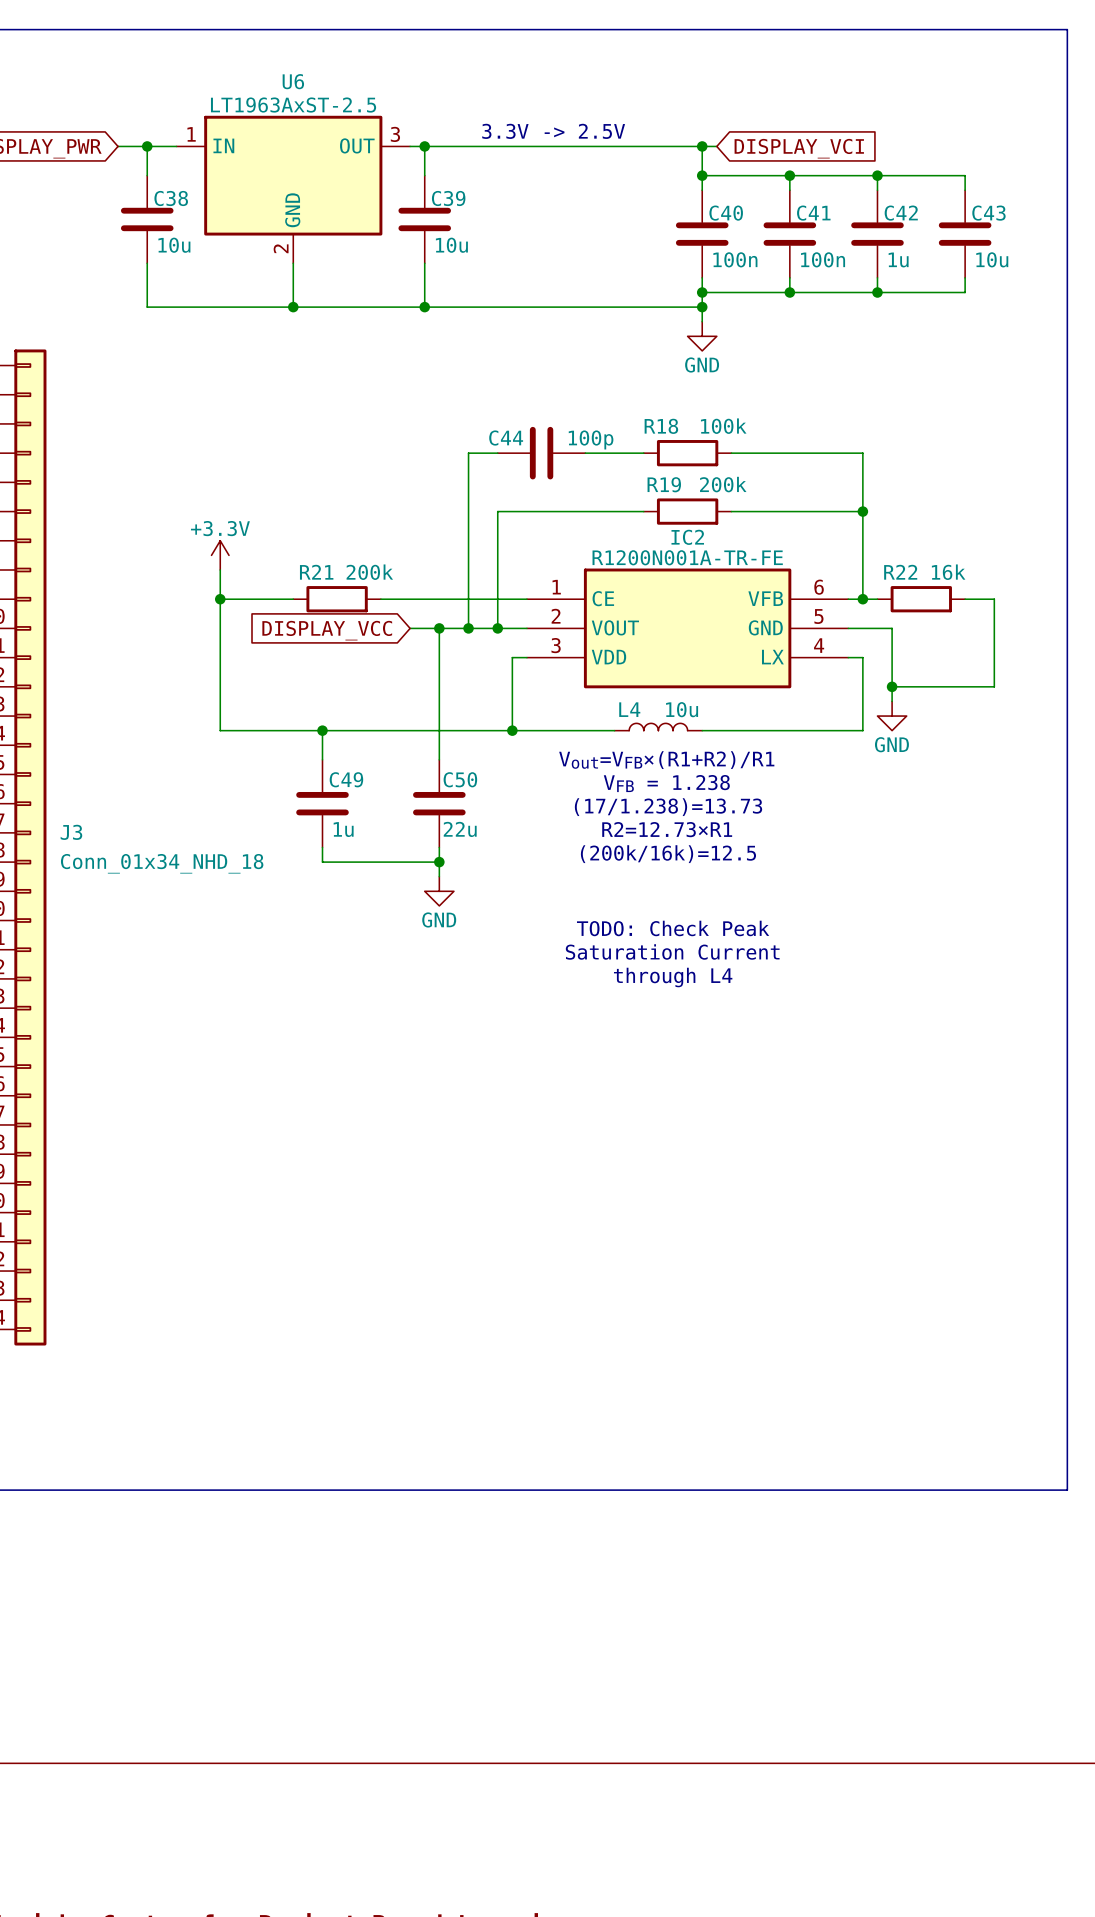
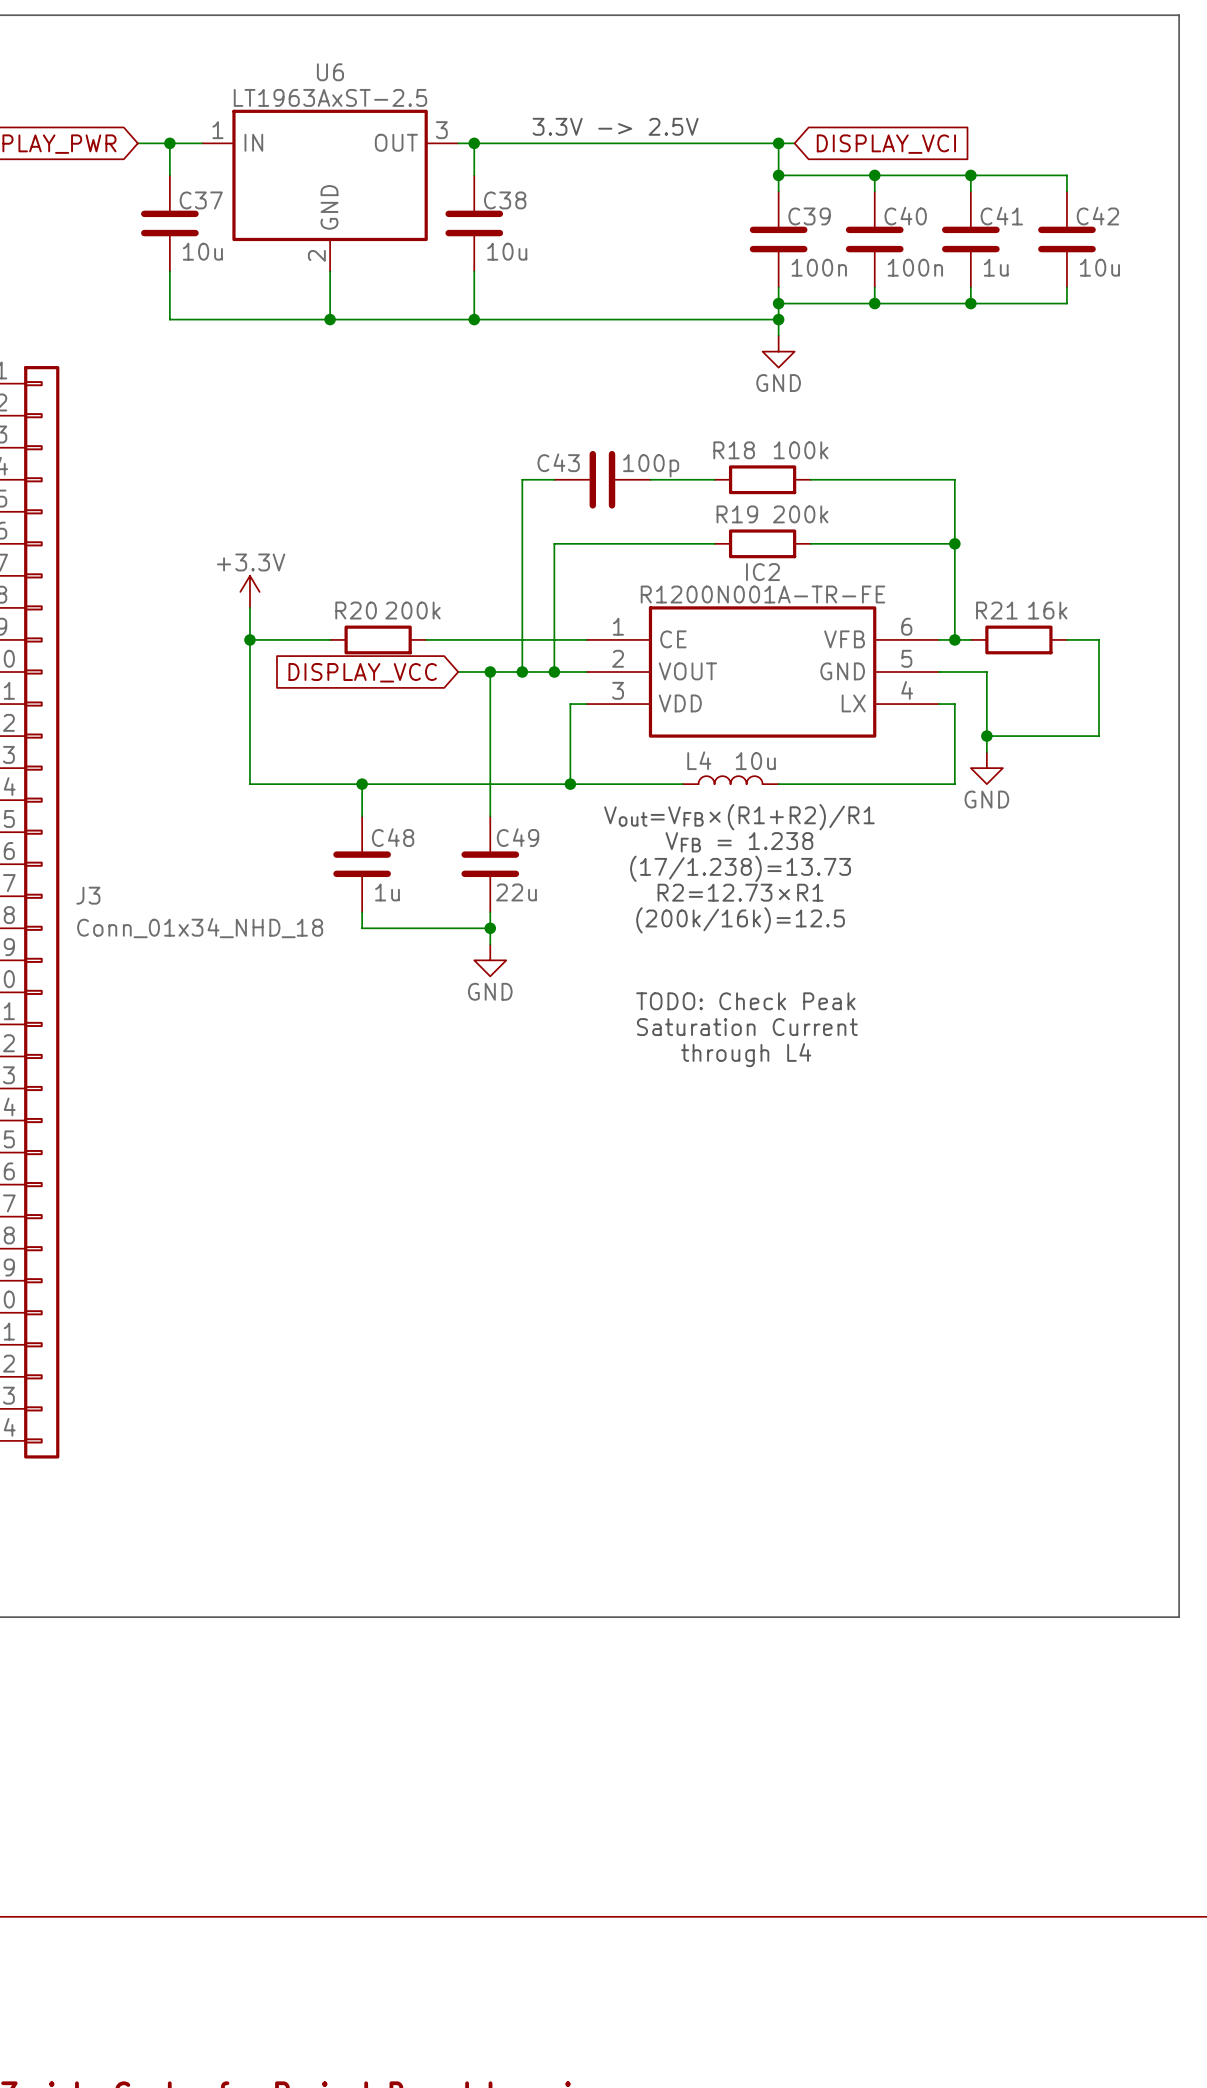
C38 name: C38 (171, 198) -> C37 (201, 200)
C39 name: C39 (448, 198) -> C38 (505, 200)
C40 name: C40 (726, 213) -> C39 (809, 216)
C41 name: C41 (813, 213) -> C40 (905, 216)
C42 name: C42 (901, 213) -> C41 (1001, 216)
C43 name: C43 (988, 213) -> C42 (1097, 216)
C44 name: C44 (506, 438) -> C43 (558, 462)
R21 name: R21 (316, 572) -> R20 (356, 610)
R22 name: R22 (900, 572) -> R21 (996, 610)
C49 name: C49 (346, 779) -> C48 (393, 837)
C50 name: C50 (460, 779) -> C49 (518, 837)

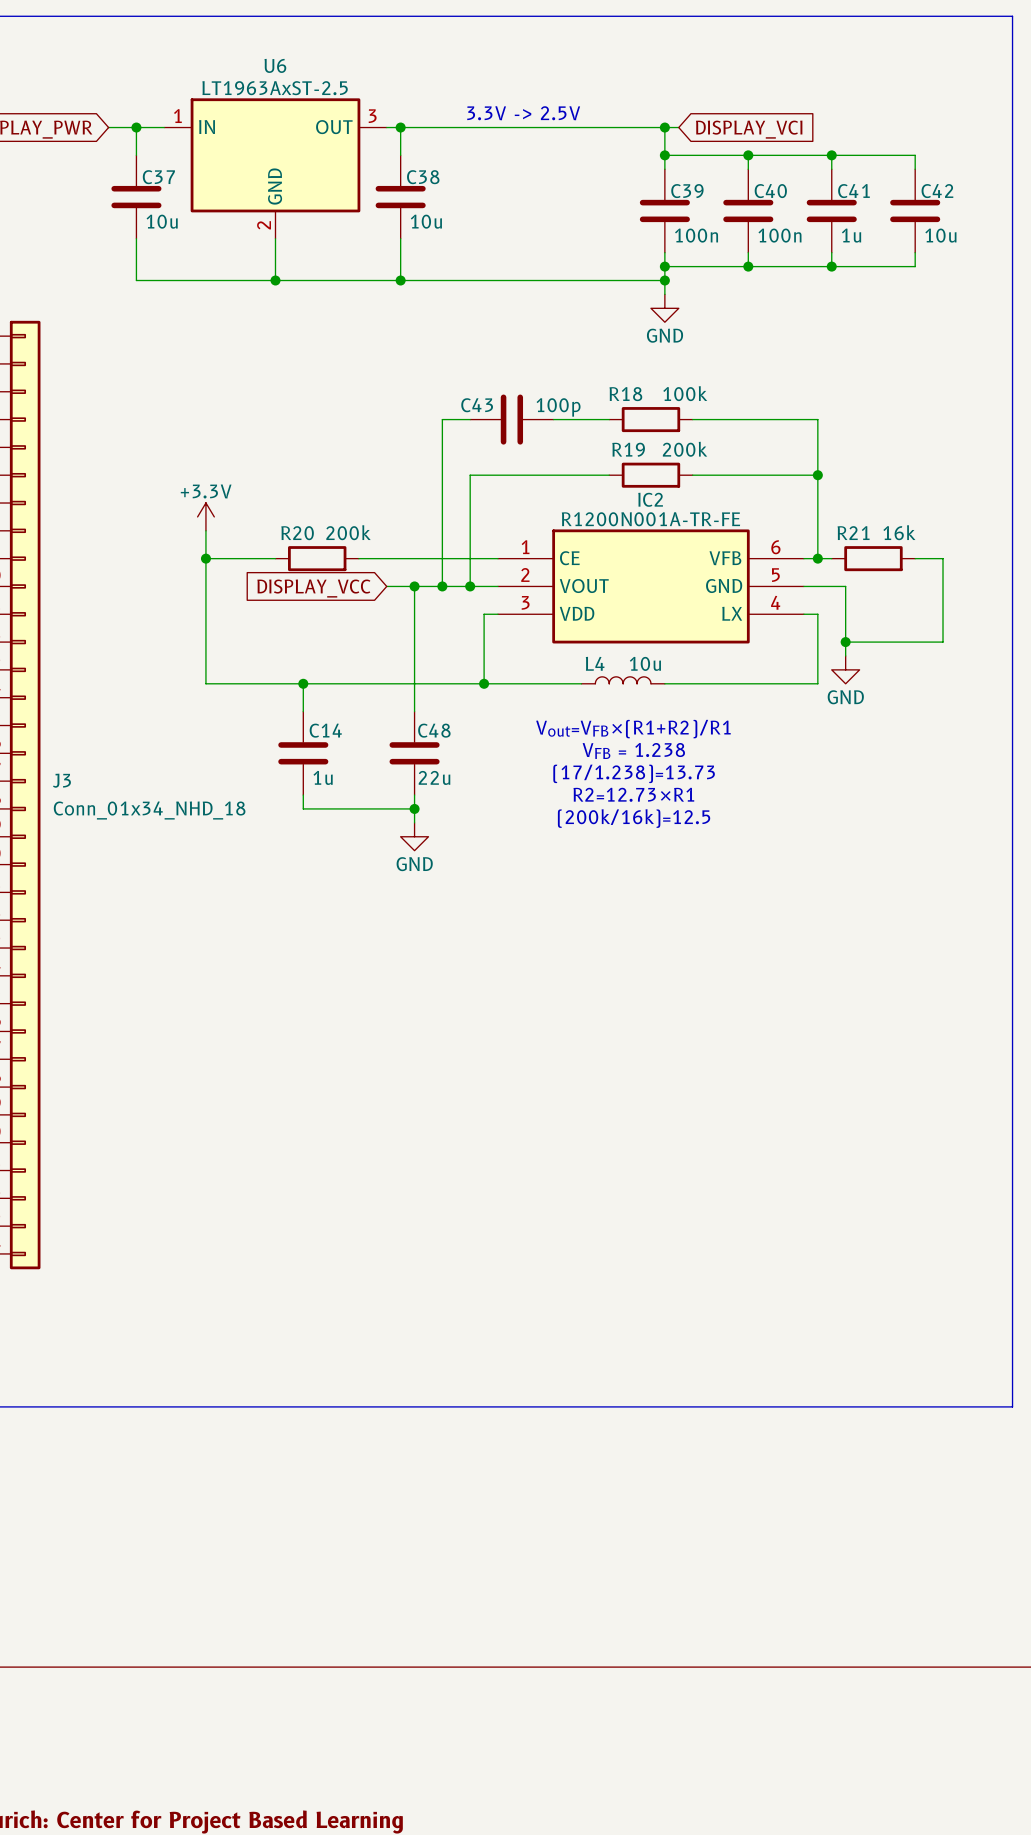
text: Vout=VFB×(R1+R2)/R1 (739, 817) -> none
C48 name: C48 (393, 837) -> C14 (325, 730)
C49 name: C49 (518, 837) -> C48 (434, 730)
text: VFB = 1.238 (739, 842) -> Vout=VFB×(R1+R2)/R1 (633, 729)
text: (17/1.238)=13.73 (740, 868) -> VFB = 1.238 (633, 750)
text: R2=12.73×R1 (740, 892) -> (17/1.238)=13.73 (634, 773)
text: (200k/16k)=12.5 (740, 920) -> R2=12.73×R1 (633, 794)
text: none -> (200k/16k)=12.5 (634, 818)
text: TODO: Check Peak (745, 1001) -> none
text: Saturation Current (747, 1027) -> none
text: through L4 (746, 1055) -> none

